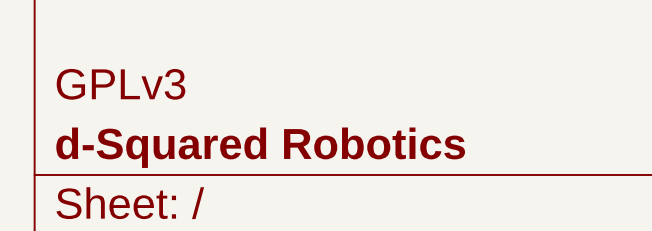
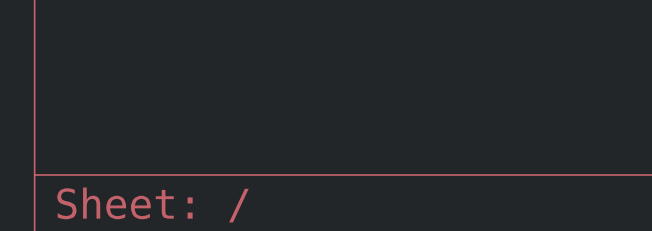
title block: GPLv3 (121, 84) -> none
title block: d-Squared Robotics (260, 147) -> none

